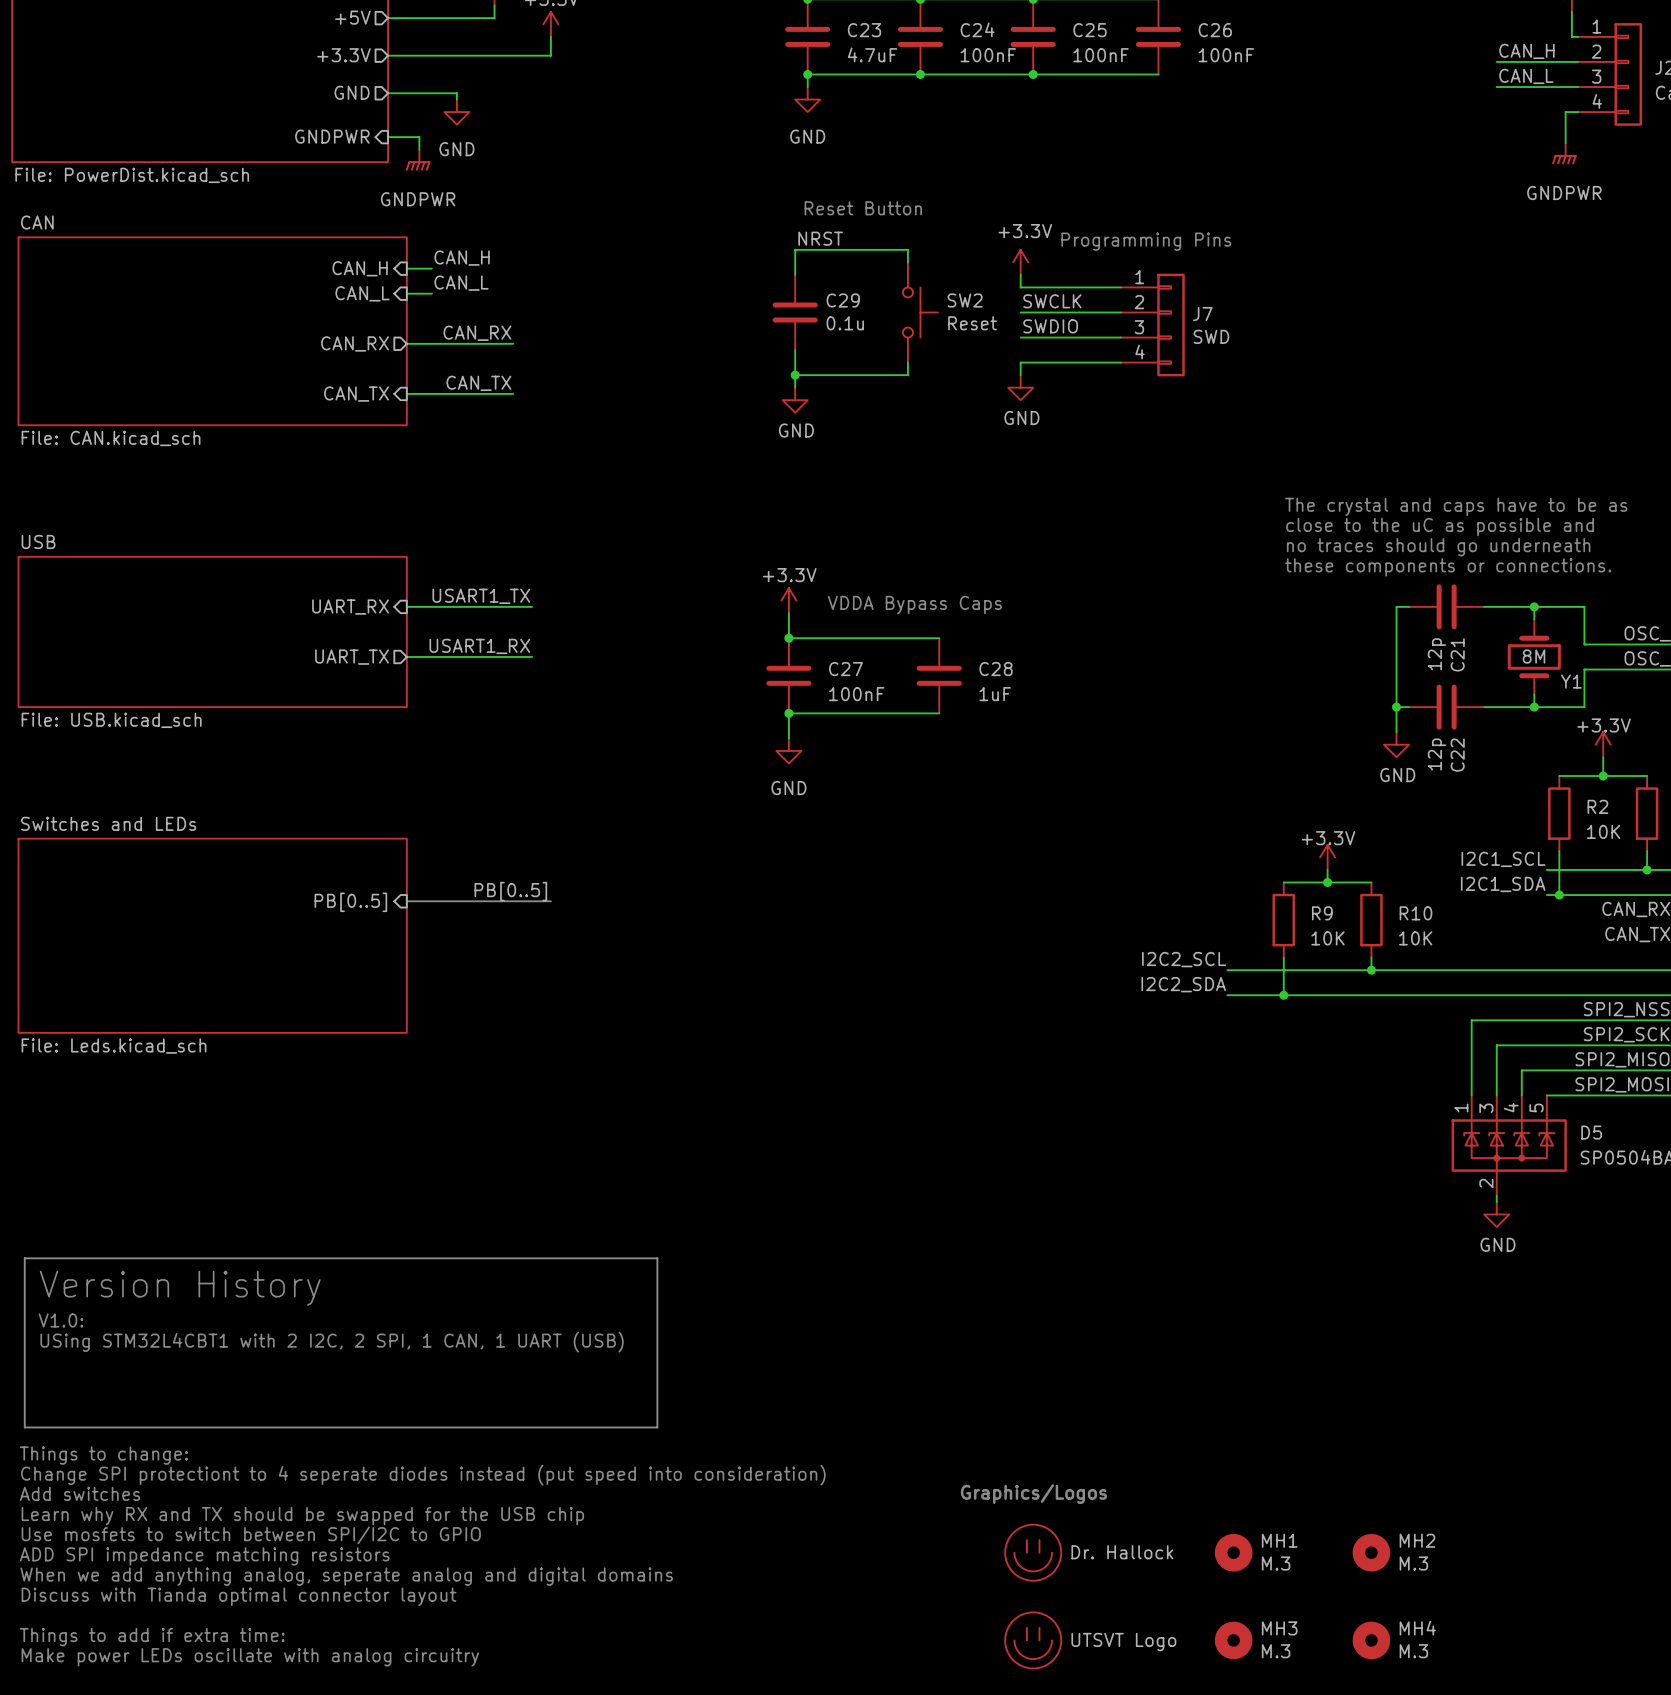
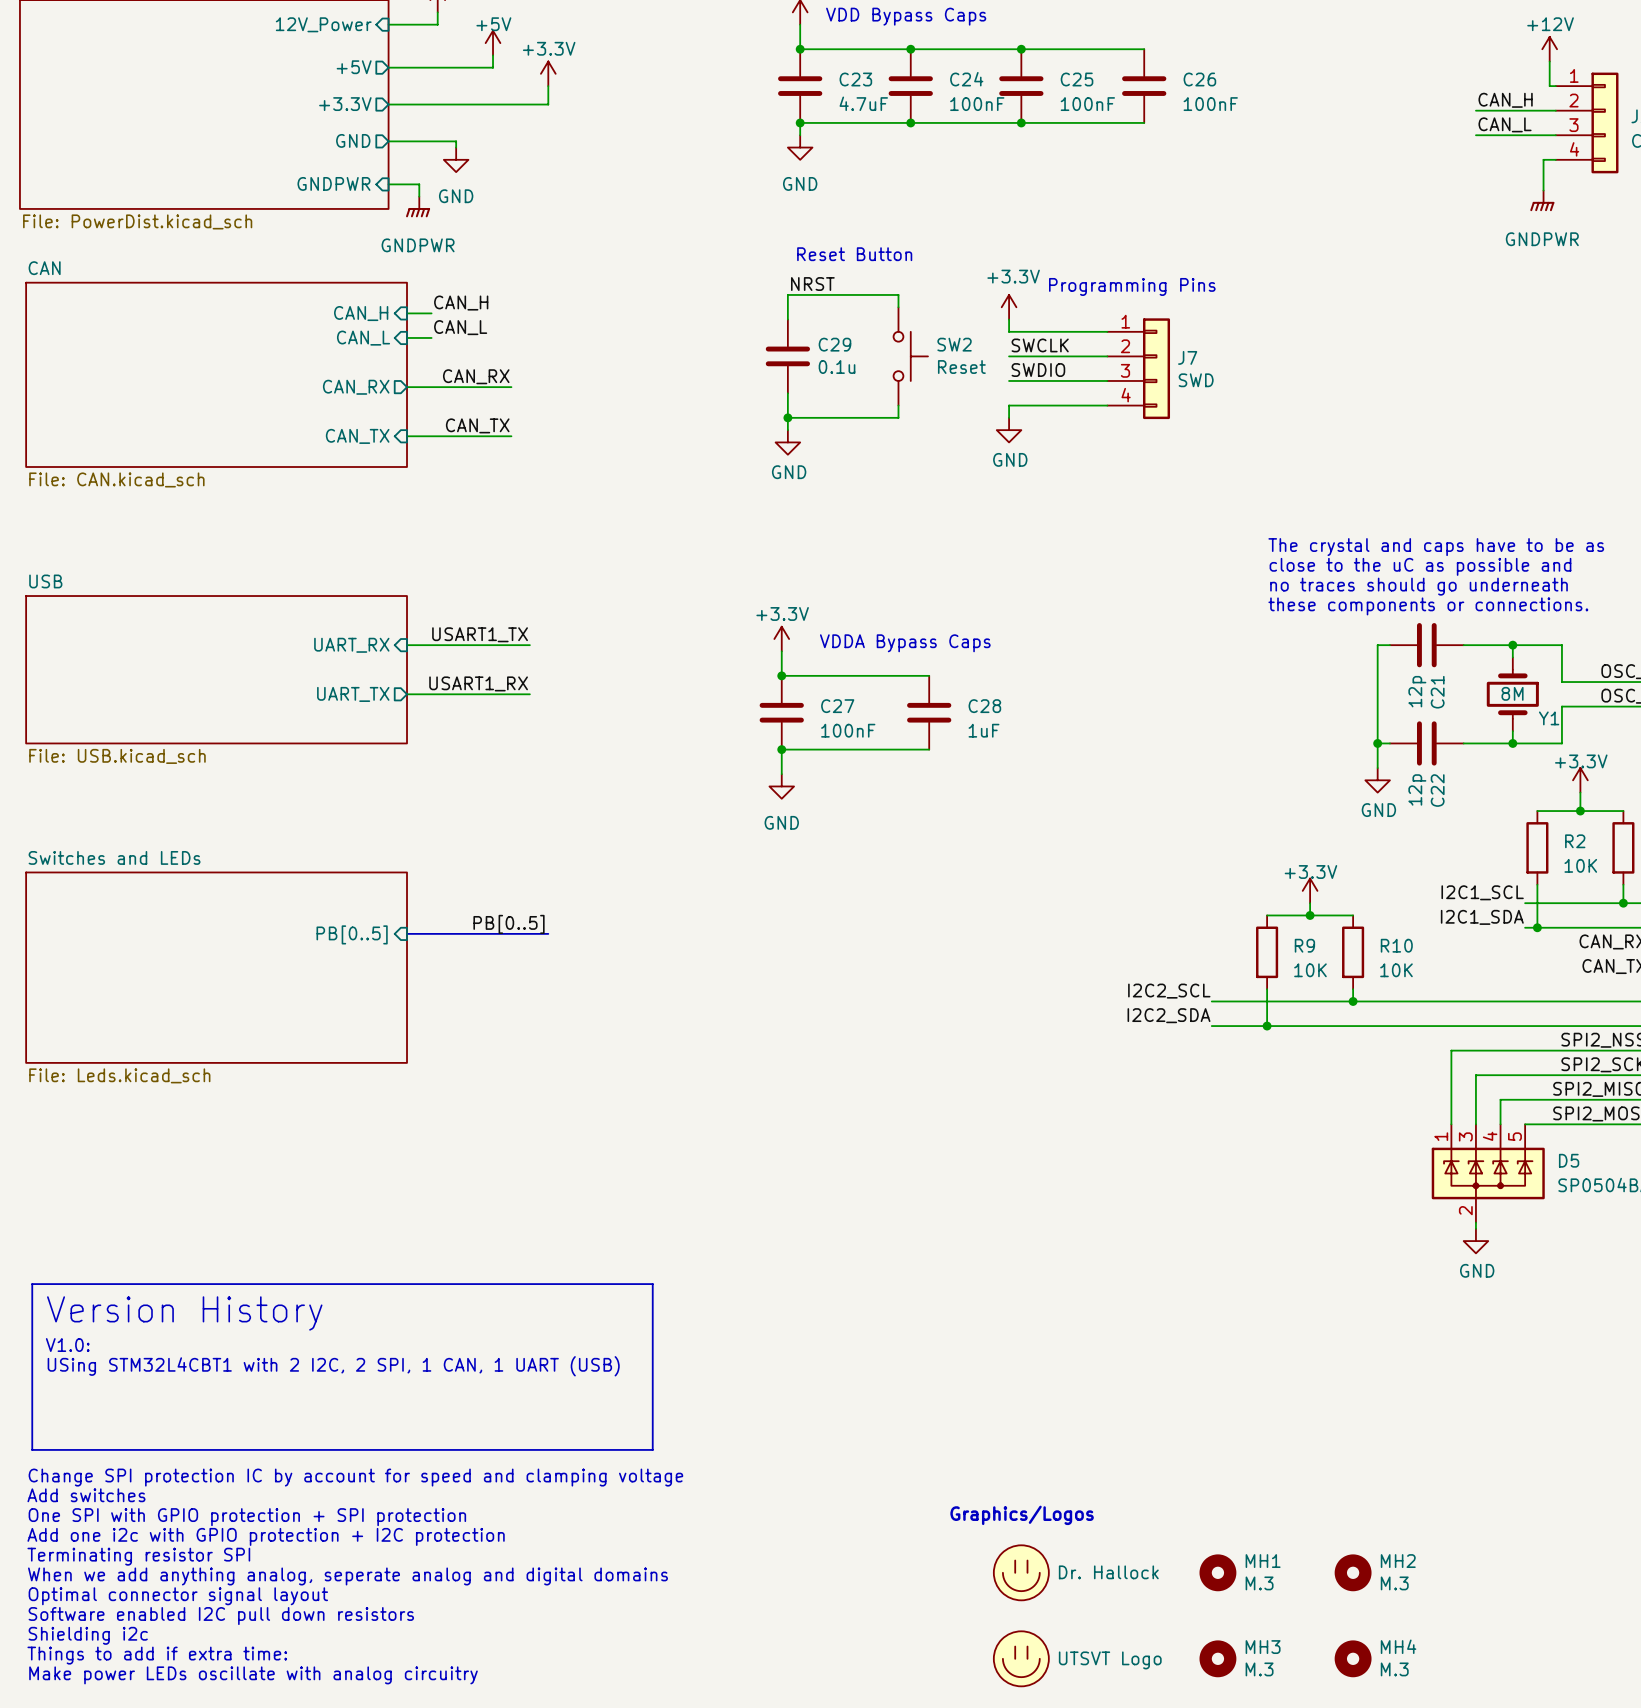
text: Things to change: (103, 1455) -> Change SPI protection IC by account for speed and clamping voltage (355, 1477)
text: Change SPI protectiont to 4 seperate diodes instead (put speed into consideration) (423, 1475) -> Add switches (86, 1495)
text: Add switches (80, 1493) -> One SPI with GPIO protection + SPI protection (247, 1517)
text: Learn why RX and TX should be swapped for the USB chip (302, 1516) -> Add one i2c with GPIO protection + I2C protection (266, 1536)
text: Use mosfets to switch between SPI/I2C to GPIO (251, 1535) -> Terminating resistor SPI (138, 1556)
text: ADD SPI impedance matching resistors (204, 1556) -> When we add anything analog, seperate analog and digital domains (348, 1576)
text: When we add anything analog, seperate analog and digital domains (346, 1576) -> Optimal connector signal layout (178, 1596)
text: Discuss with Tianda optimal connector layout (239, 1596) -> Software enabled I2C pull down resistors (221, 1616)
text: none -> Shielding i2c (88, 1635)

